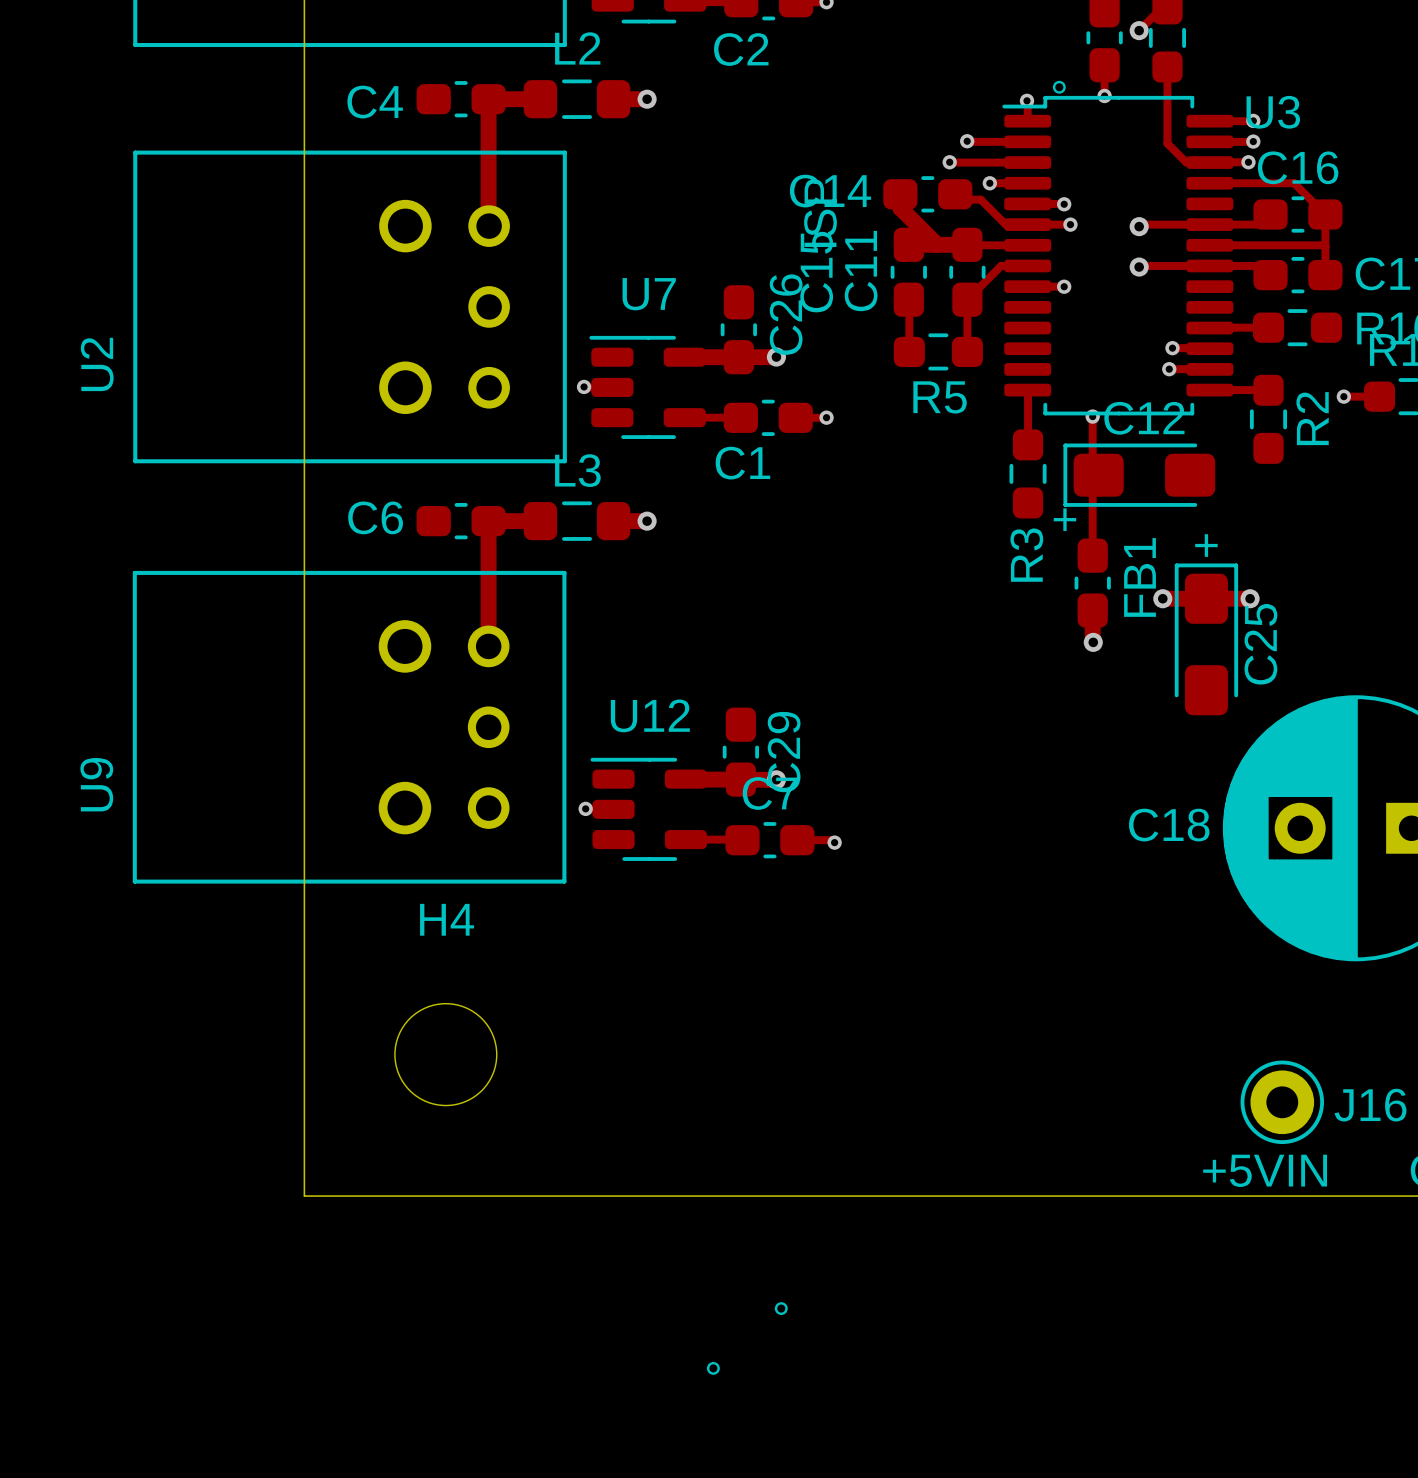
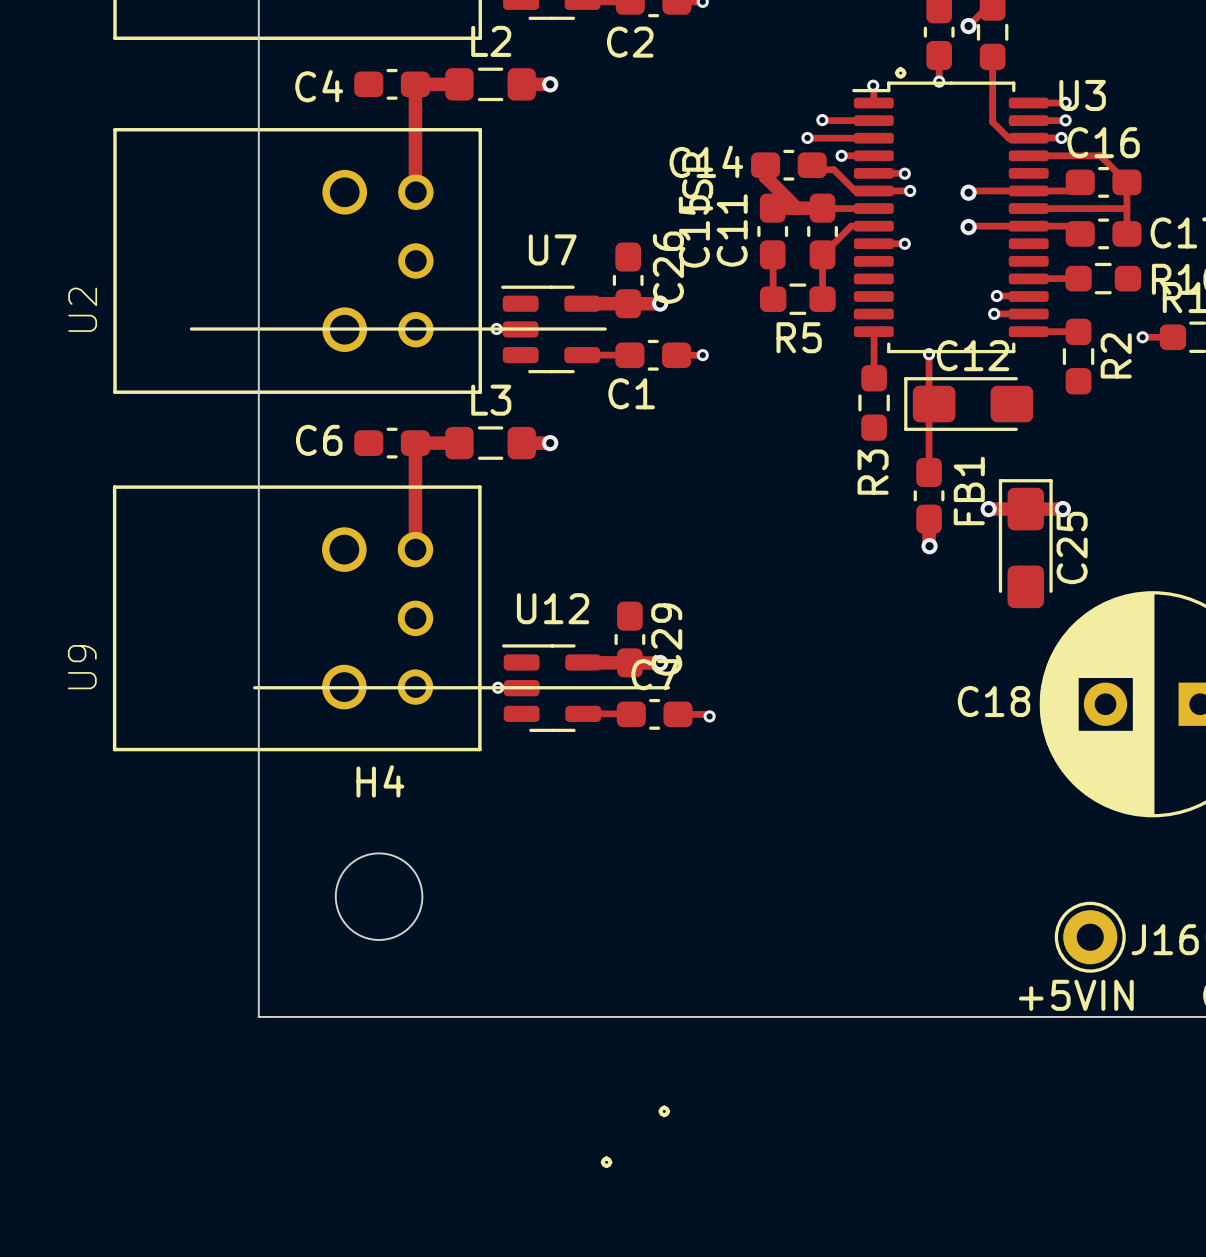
line: none -> (191, 329) (605, 329)
text: + (1064, 519) -> none
text: + (1206, 545) -> none
line: none -> (254, 687) (668, 687)

